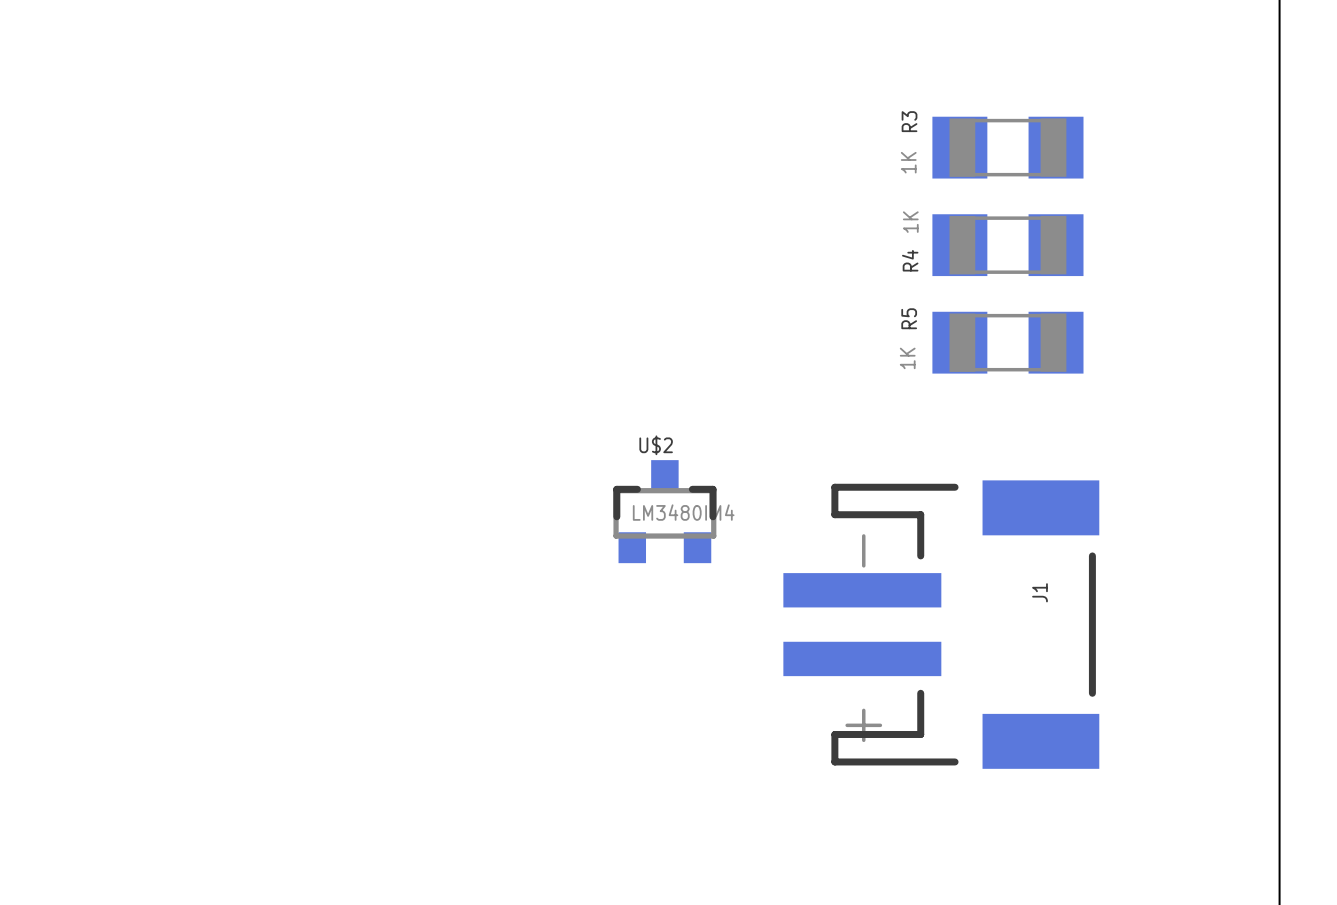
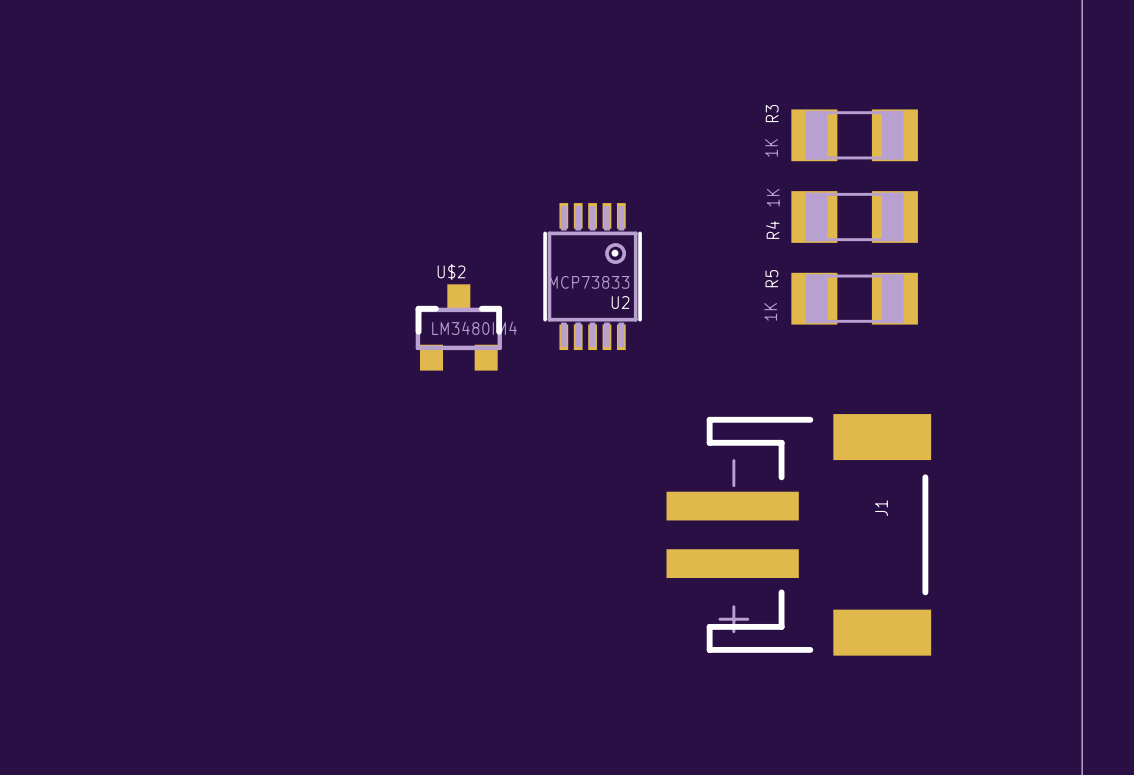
U2: none -> MCP73833 (592, 276)
U$2 position: (664, 511) -> (458, 327)

